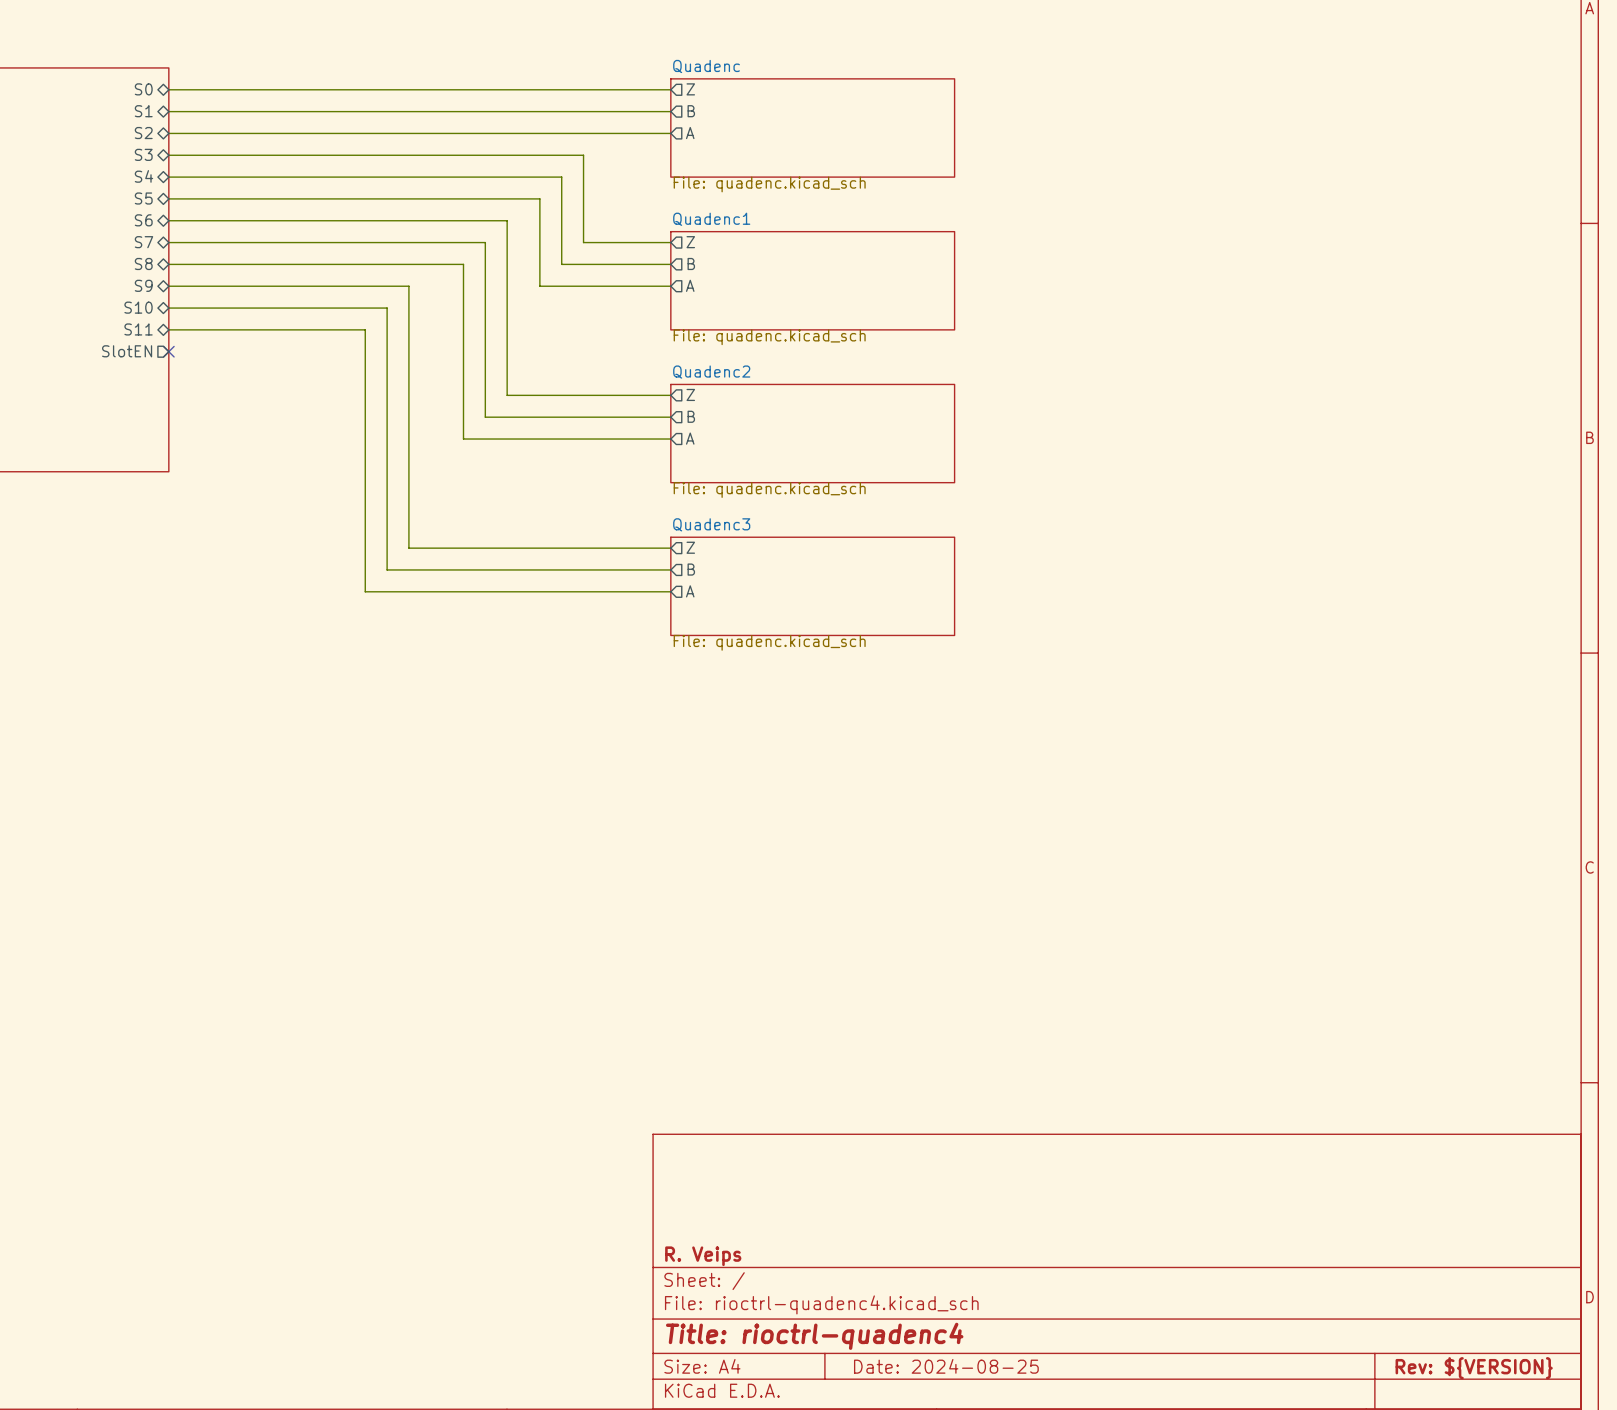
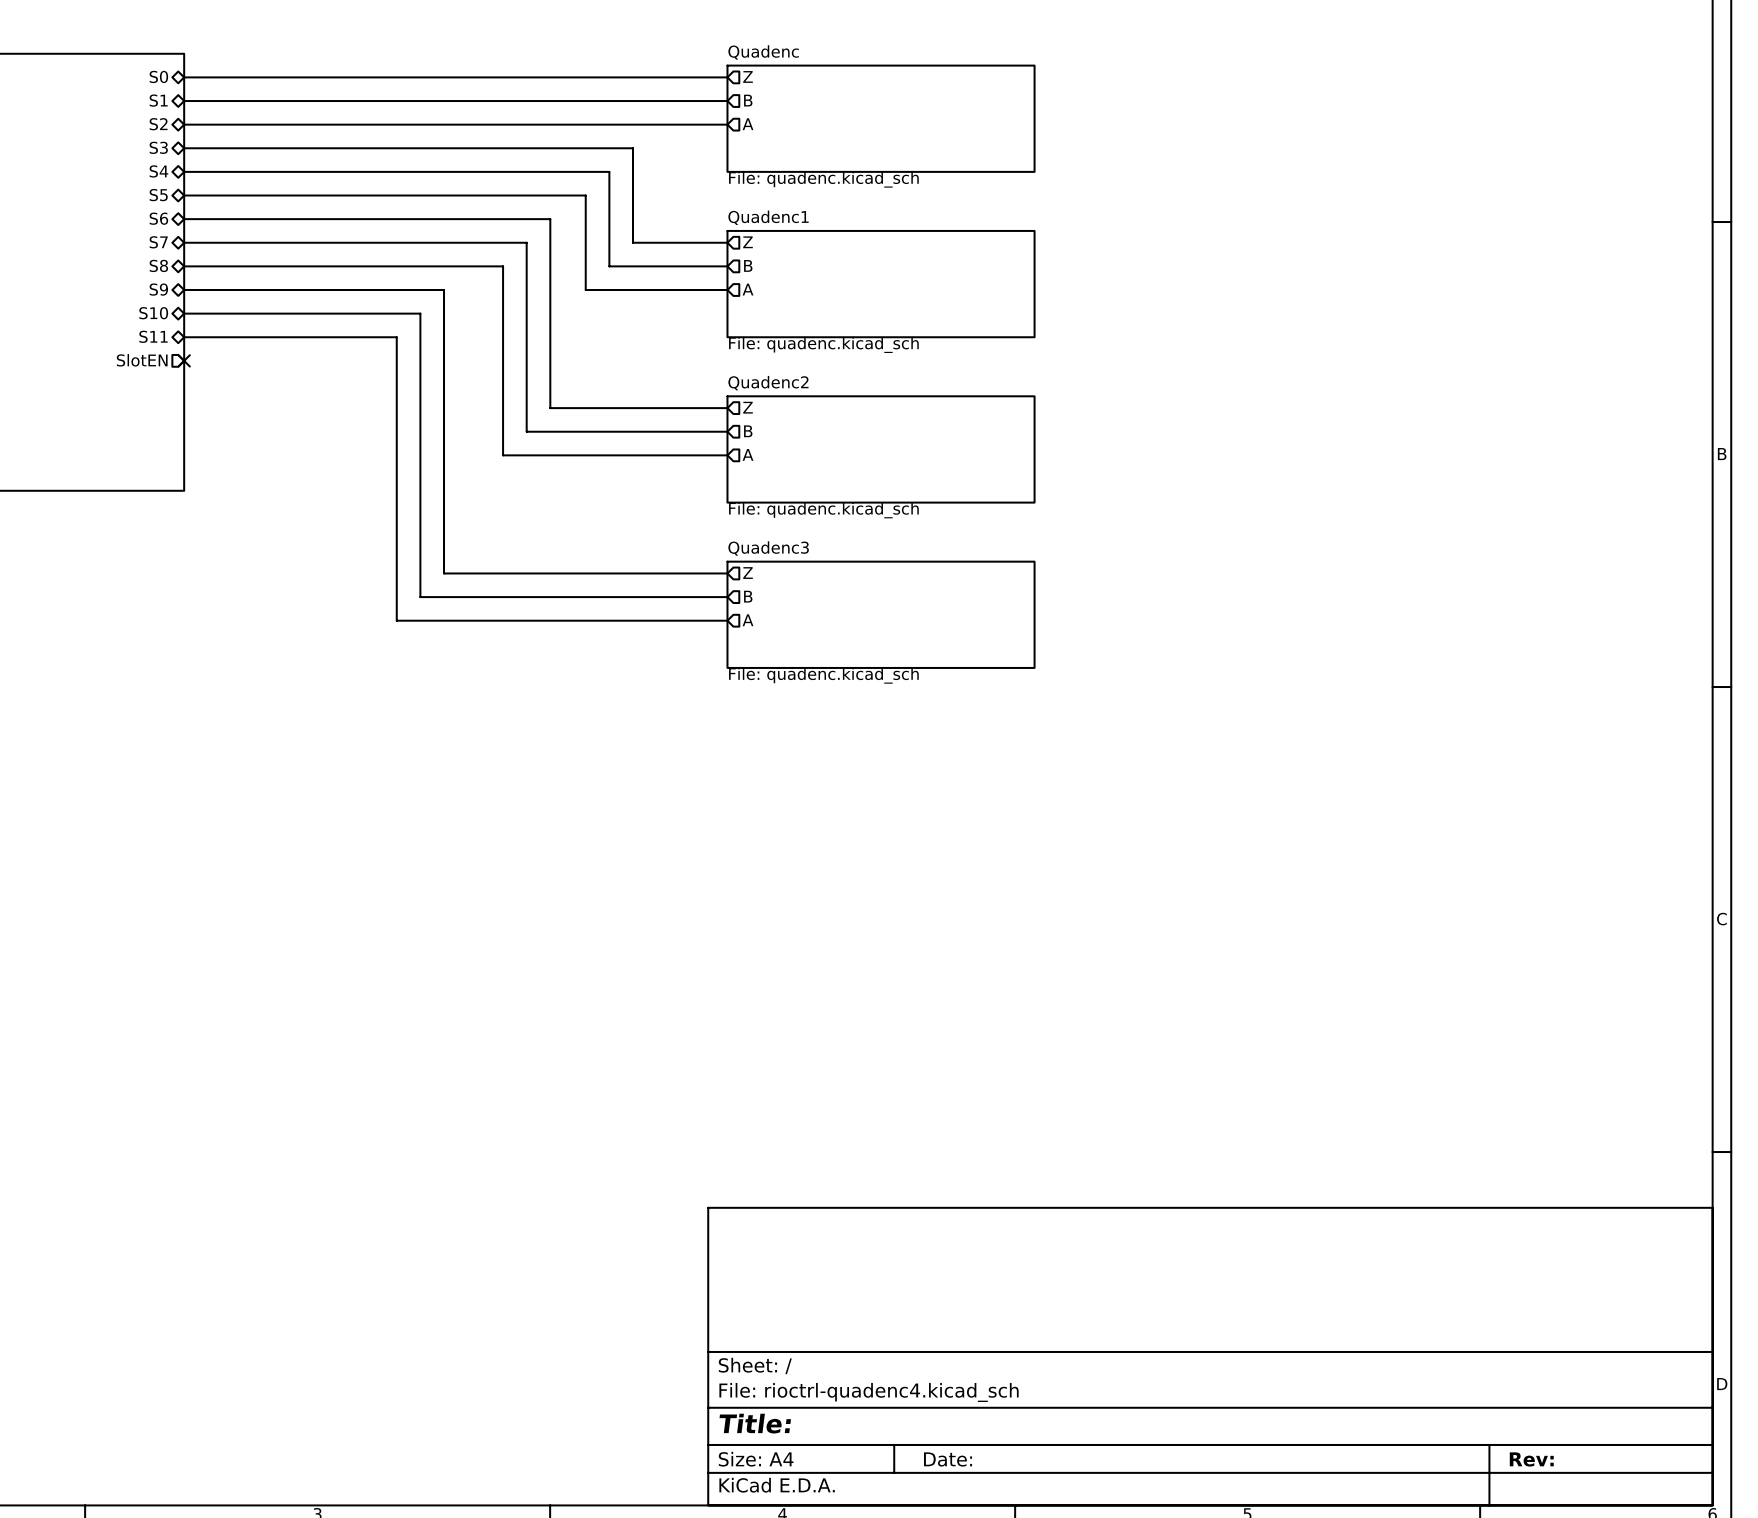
title block: R. Veips (703, 1256) -> none
title block: Title: rioctrl-quadenc4 (814, 1336) -> Title: (755, 1423)
title block: Date: 2024-08-25 (946, 1366) -> Date: (948, 1459)
title block: Rev: ${VERSION} (1474, 1368) -> Rev: (1531, 1459)

